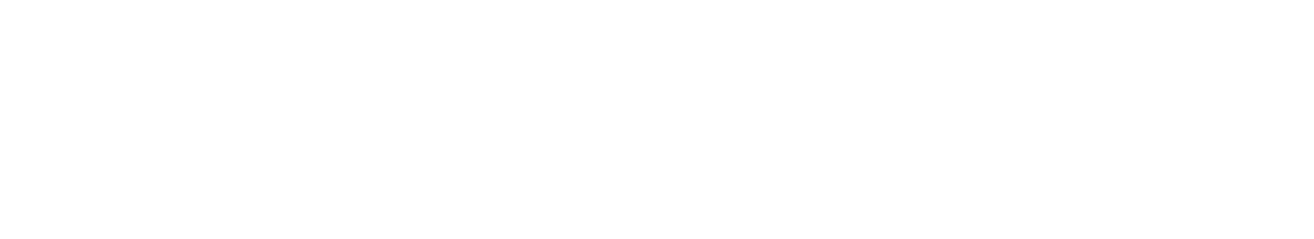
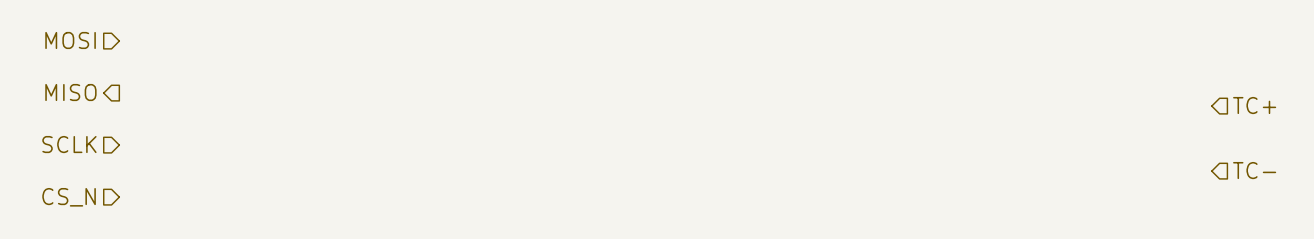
hierarchical label: none -> MOSI (70, 40)
hierarchical label: none -> MISO (70, 92)
hierarchical label: none -> TC+ (1254, 105)
hierarchical label: none -> SCLK (69, 144)
hierarchical label: none -> TC- (1254, 170)
hierarchical label: none -> CS_N (69, 197)

